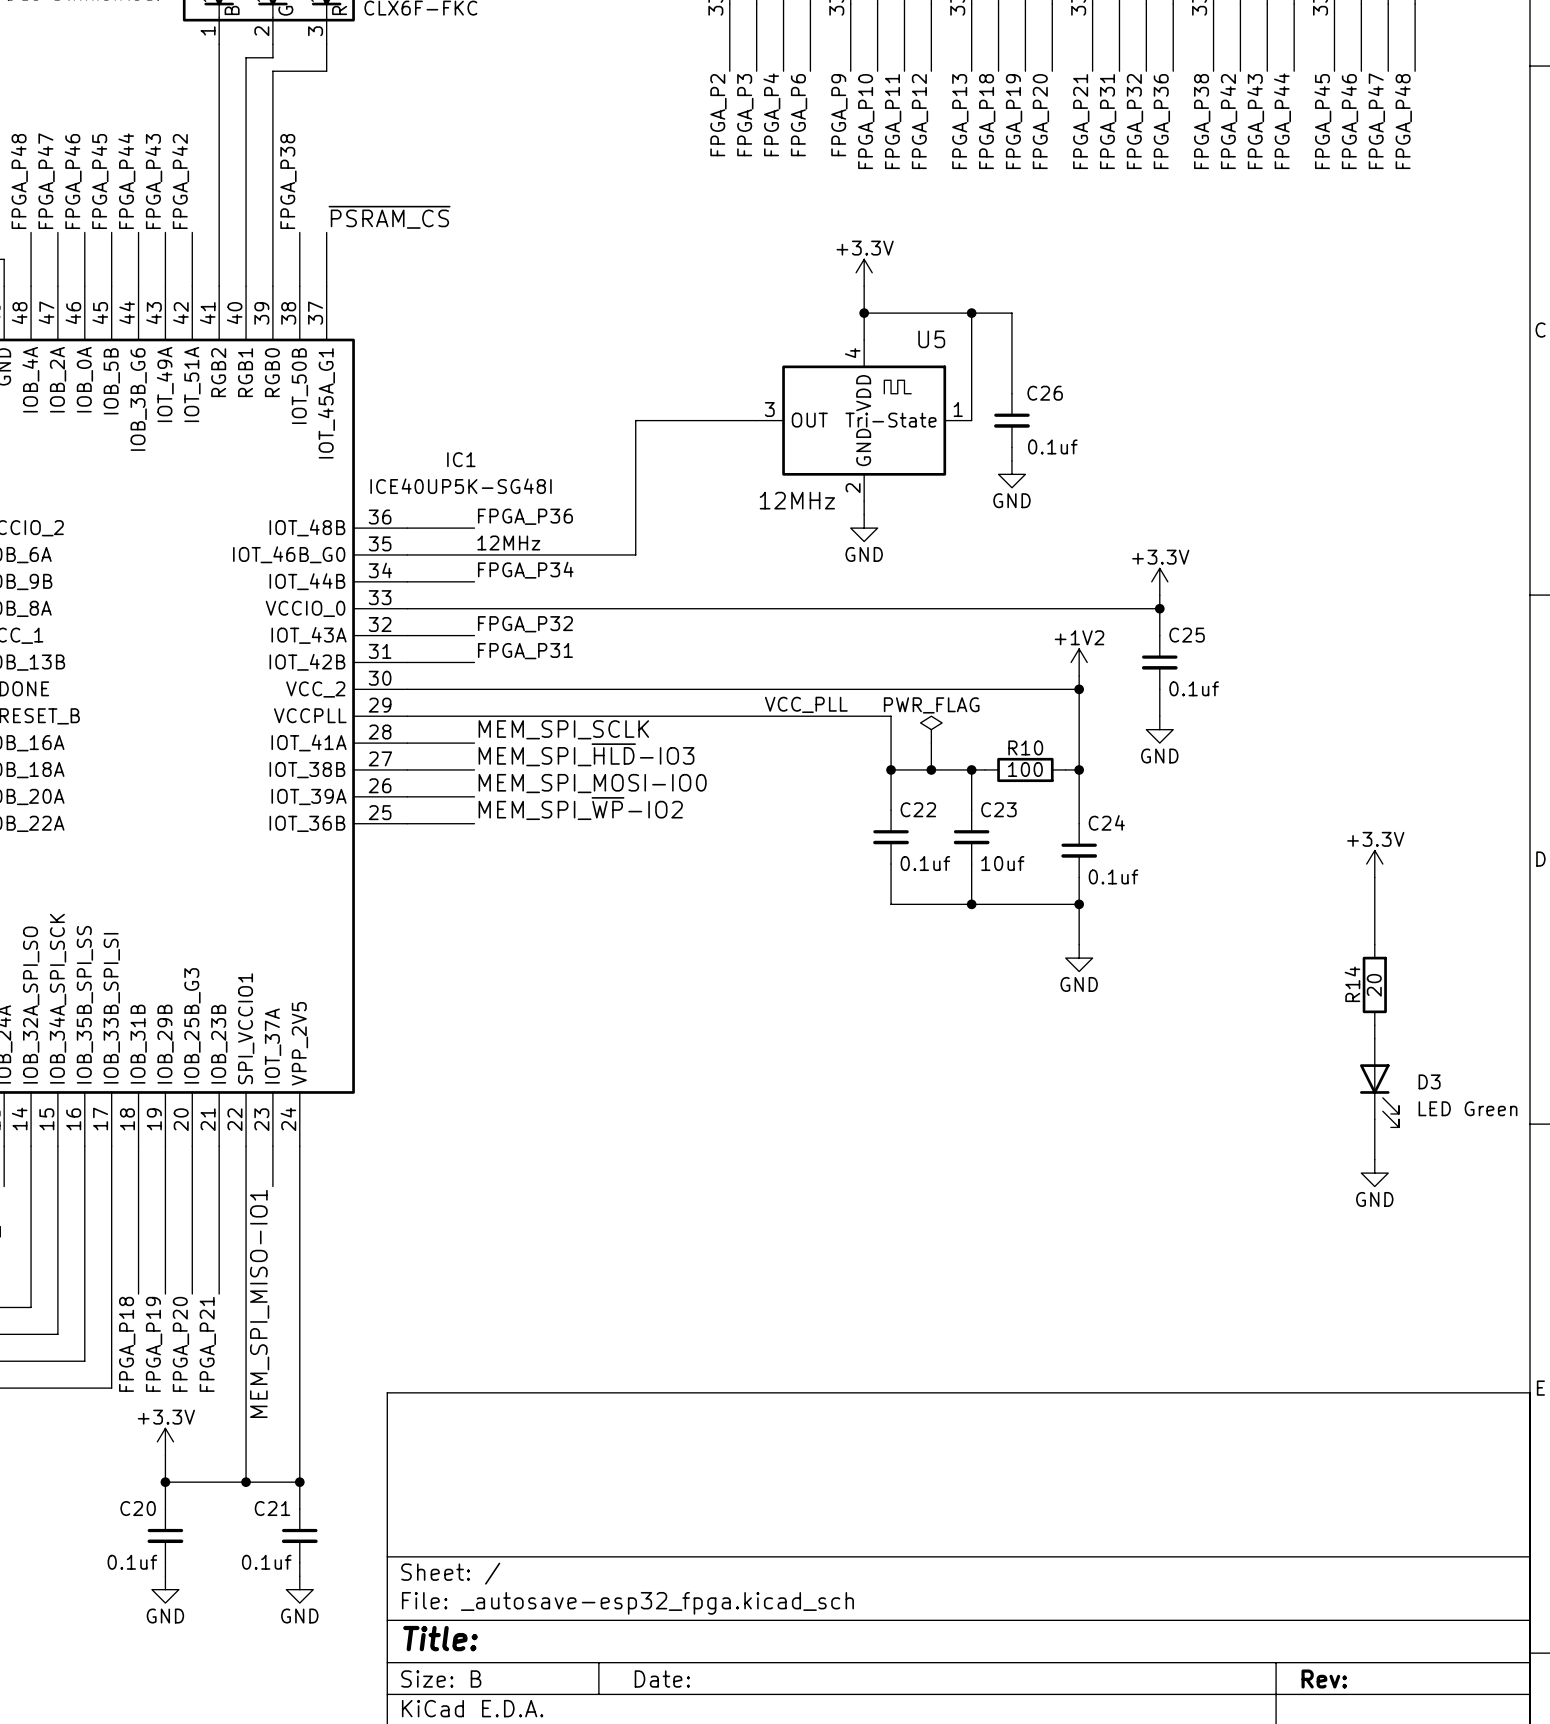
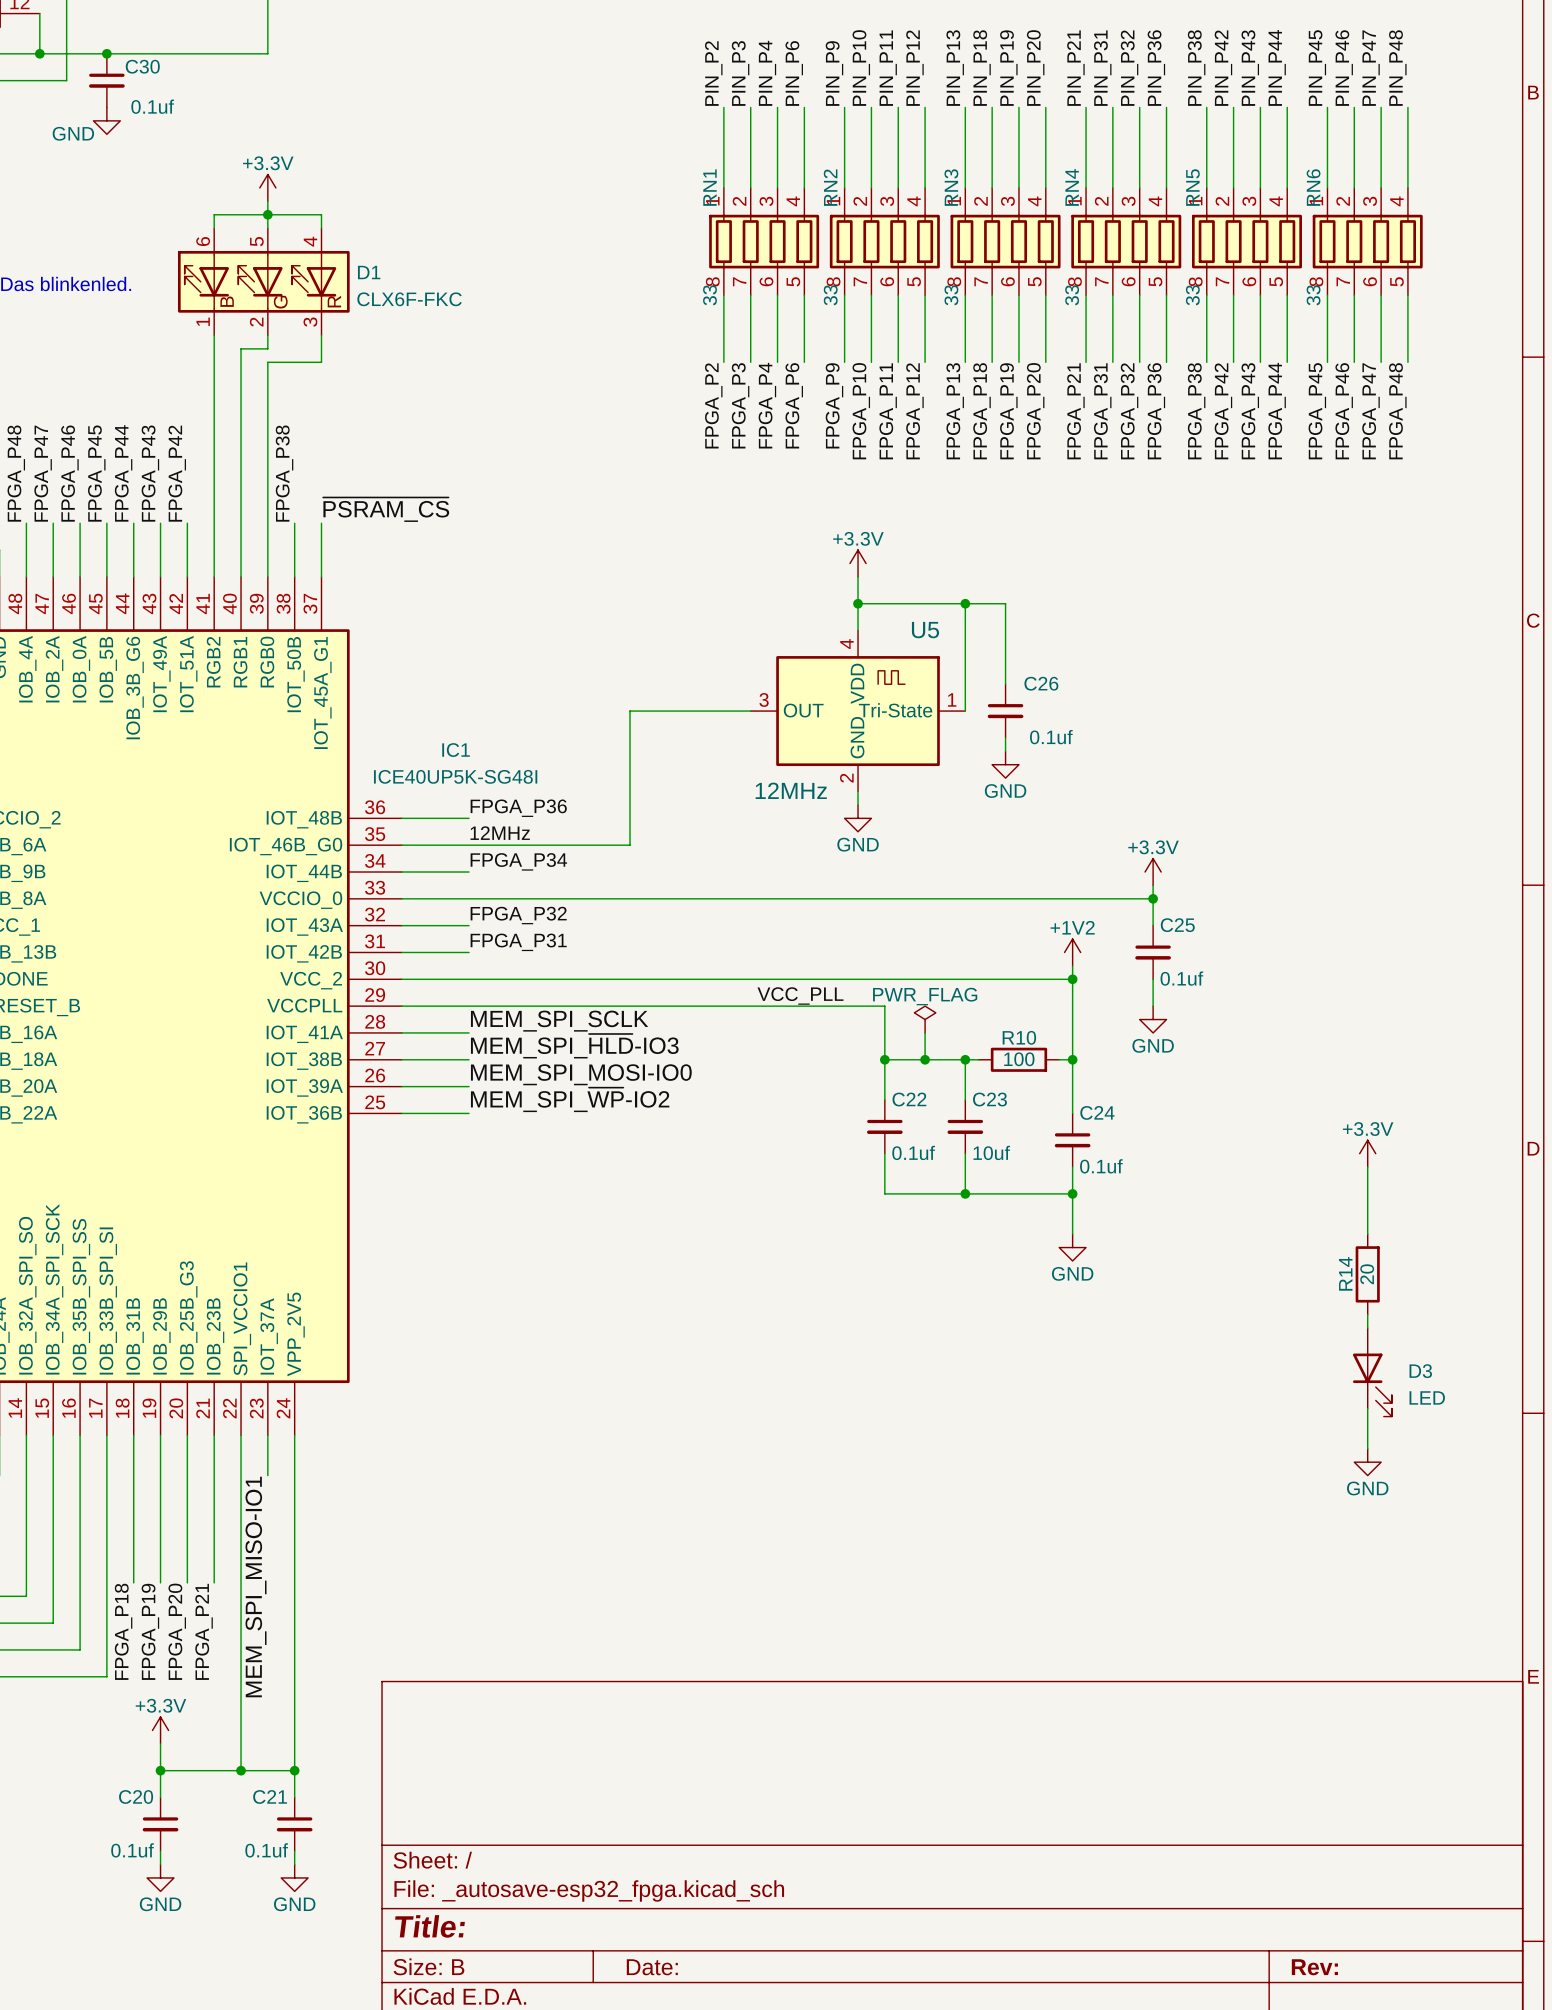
D3 value: LED Green (1467, 1108) -> LED (1427, 1397)

